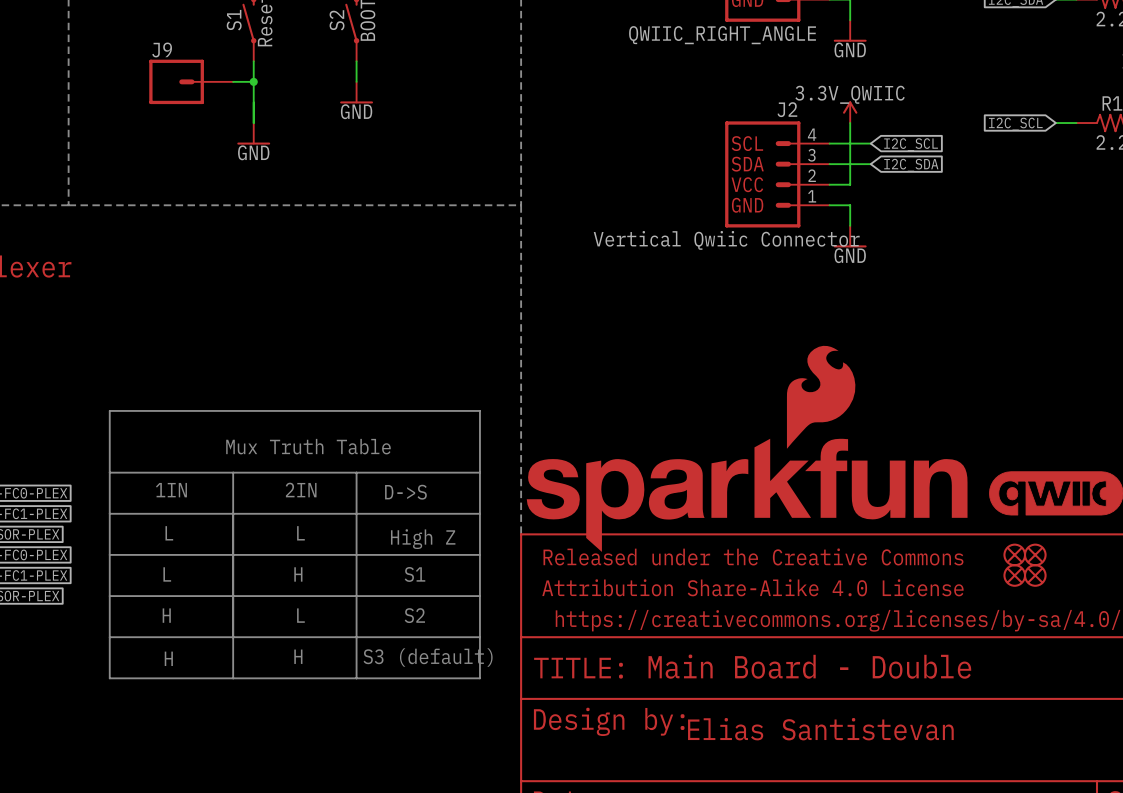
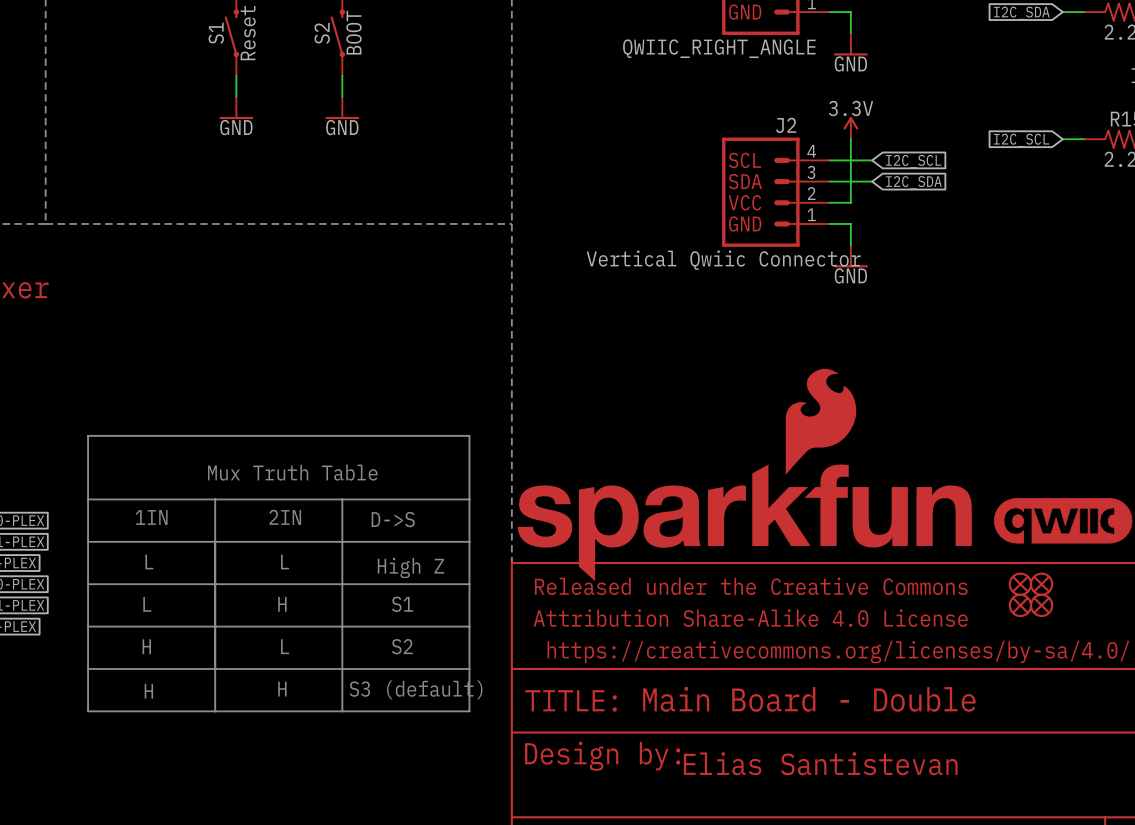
J9: (191, 81) -> none
wire: (233, 81) (253, 81) (253, 123) -> none
junction: (253, 81) -> none
power symbol: 3.3V_QWIIC (850, 112) -> 3.3V (850, 128)
power symbol position: GND (253, 133) -> GND (236, 107)

